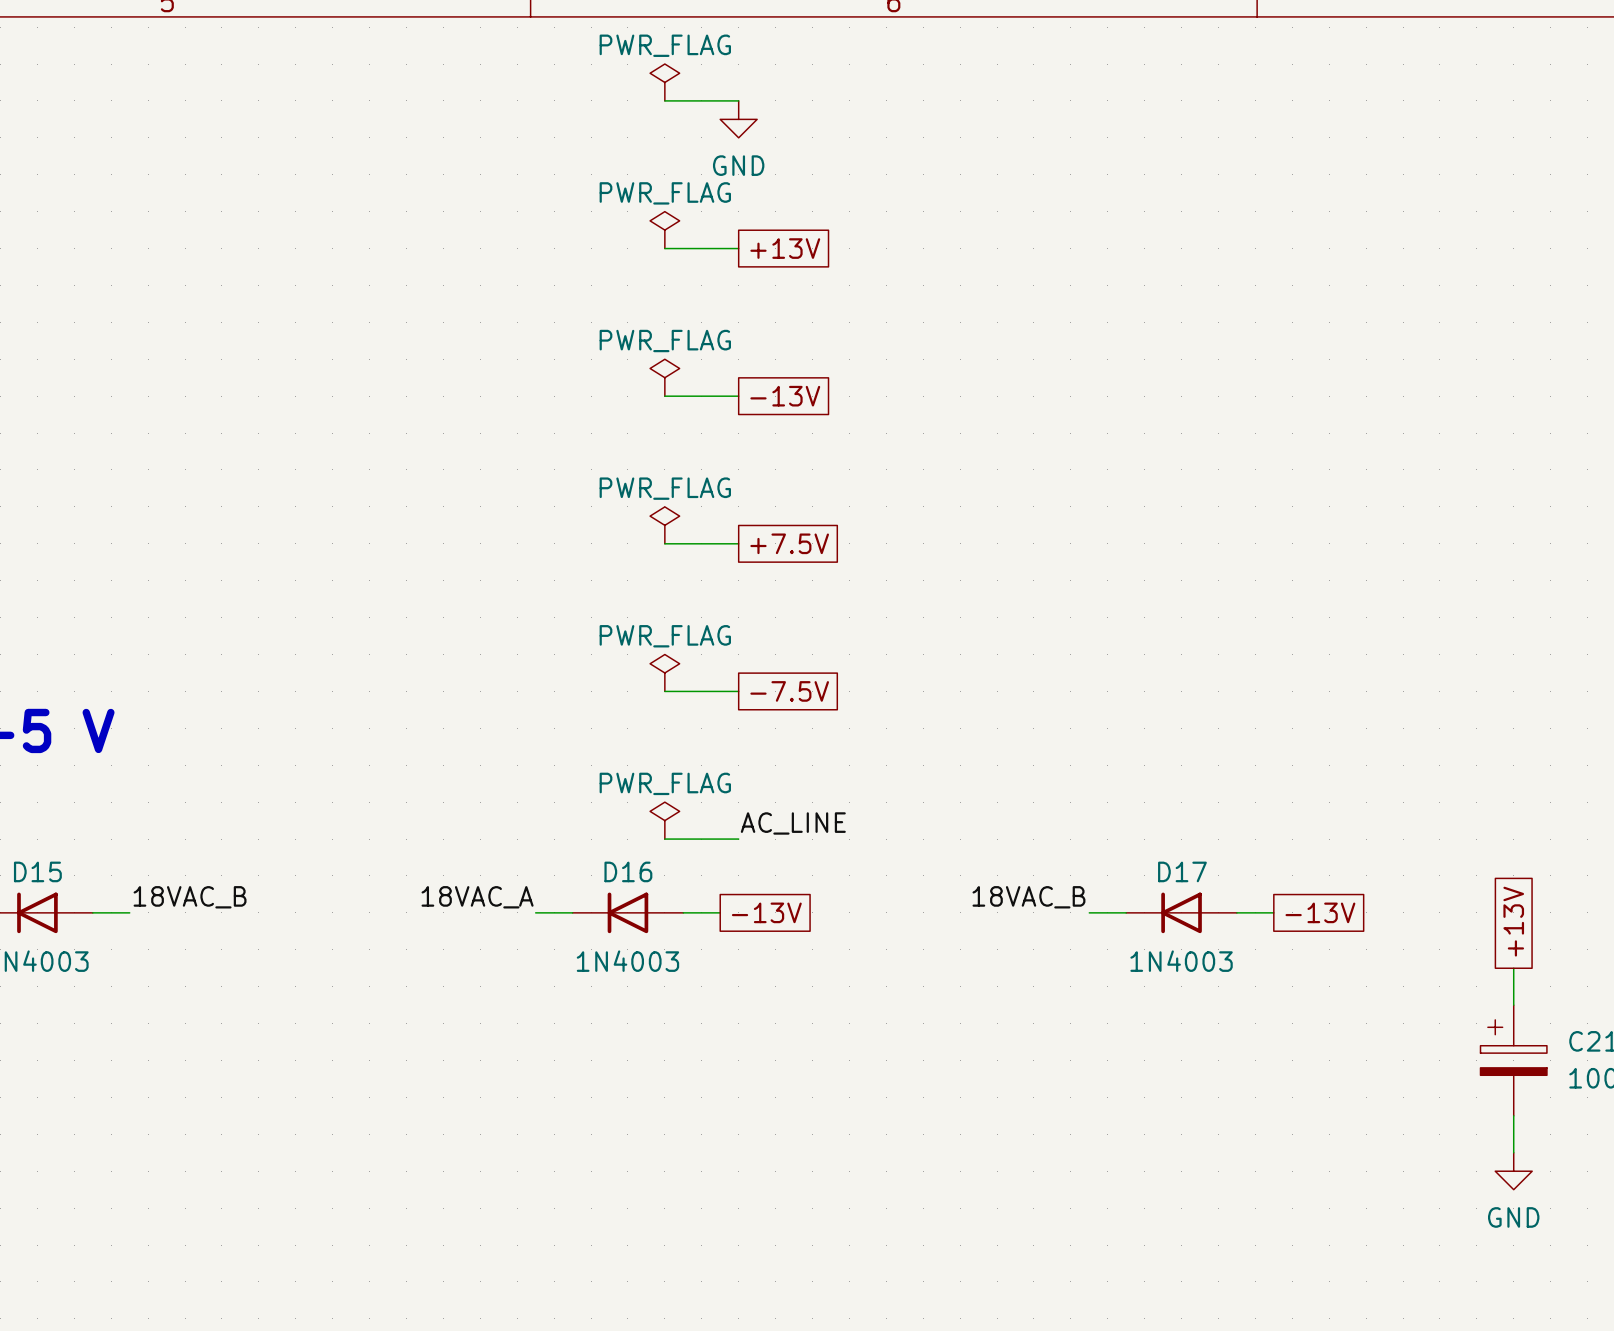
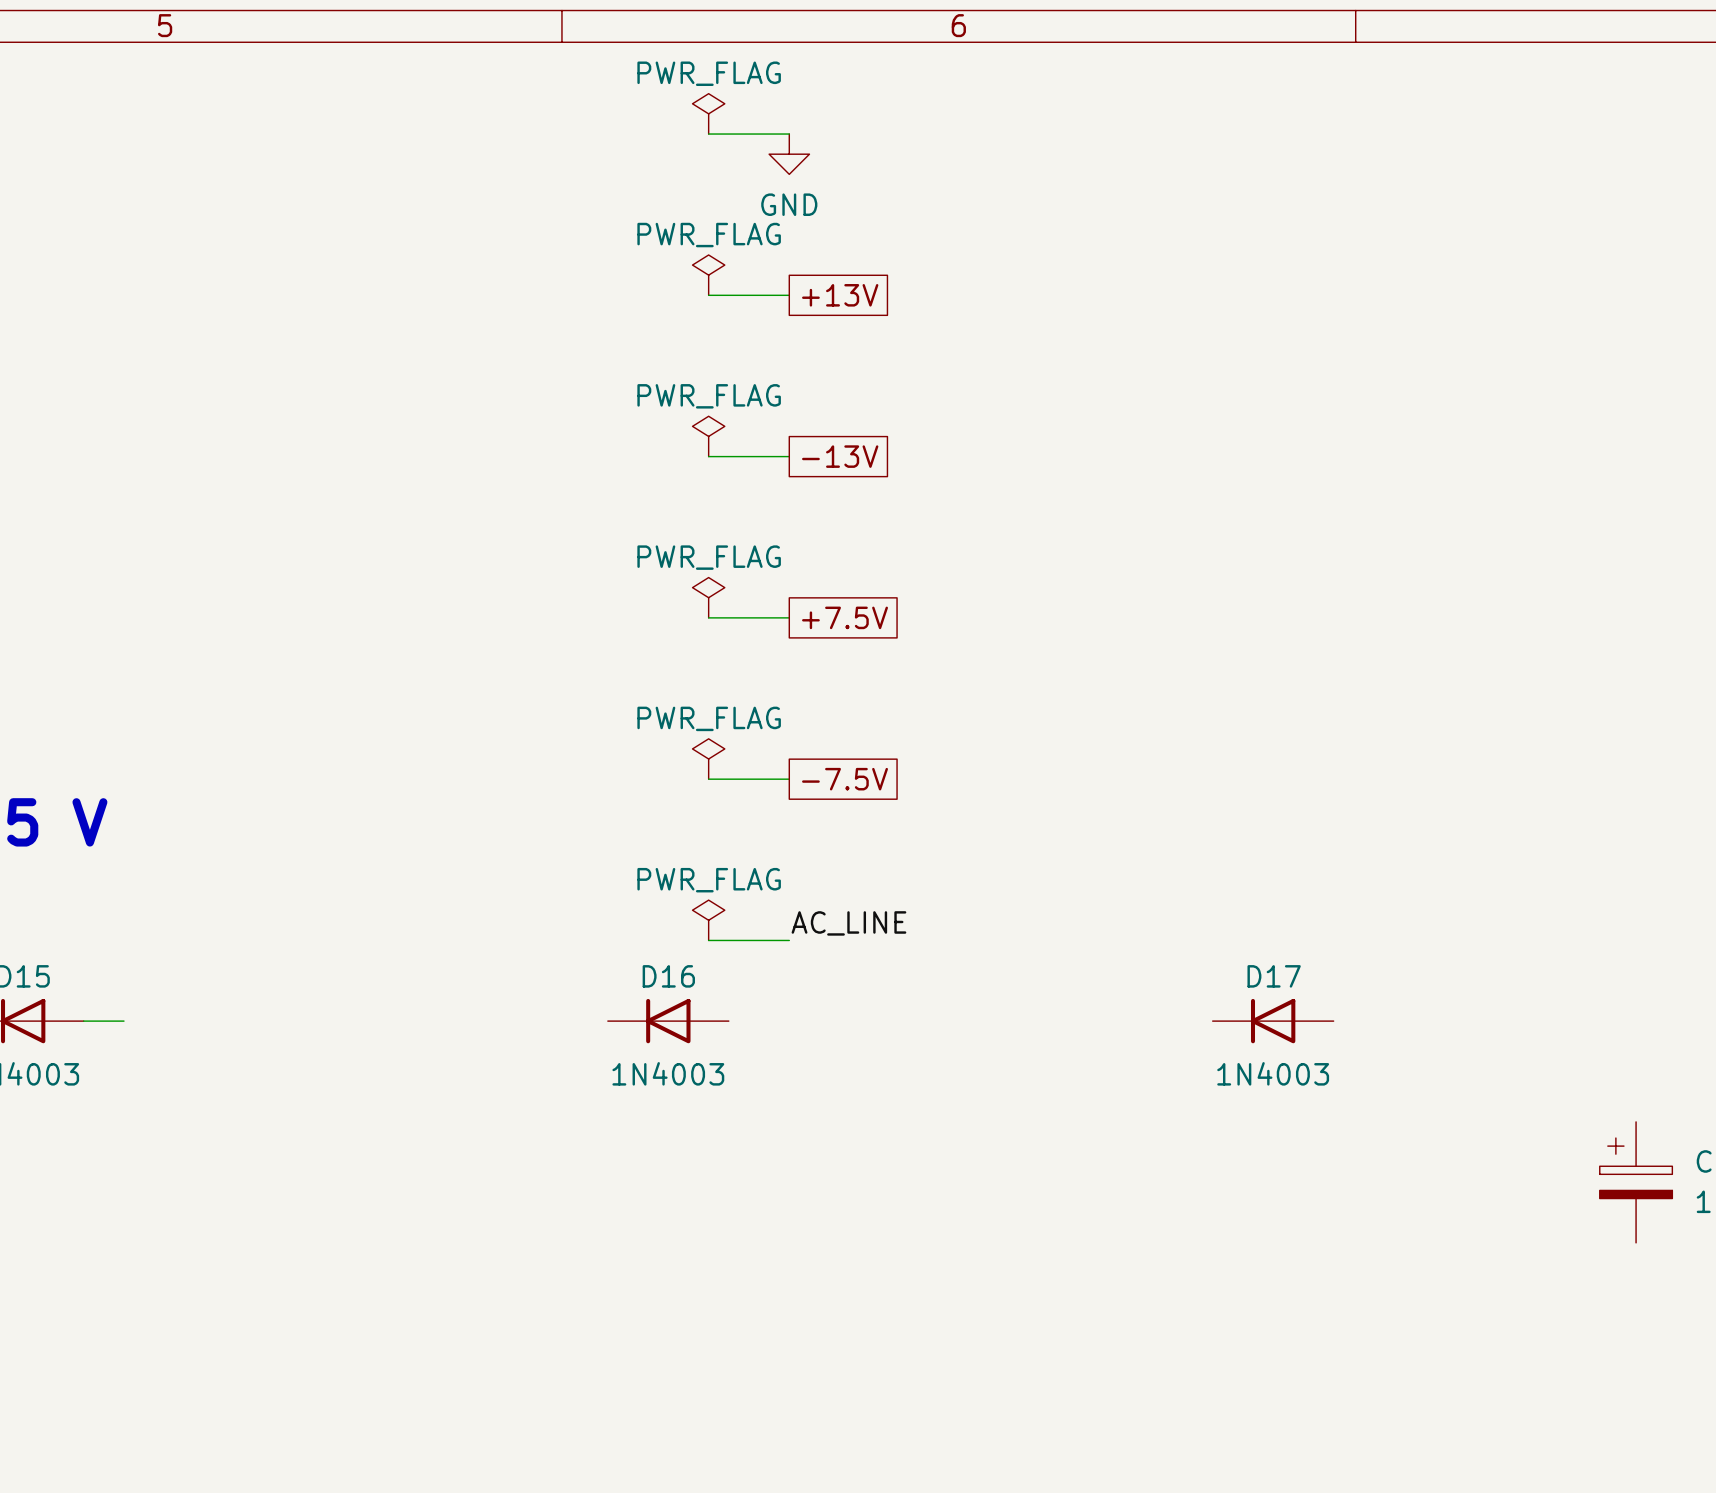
label: 18VAC_B (190, 897) -> none
label: 18VAC_A (477, 897) -> none
label: 18VAC_B (1028, 897) -> none
wire: (535, 912) (572, 912) -> none
wire: (683, 912) (720, 912) -> none
global label: -13V (766, 912) -> none
wire: (1089, 912) (1126, 912) -> none
wire: (1236, 912) (1273, 912) -> none
global label: -13V (1320, 912) -> none
global label: +13V (1513, 921) -> none
wire: (1513, 968) (1513, 1005) -> none
wire: (1513, 1115) (1513, 1152) -> none
power symbol: GND (1513, 1171) -> none

